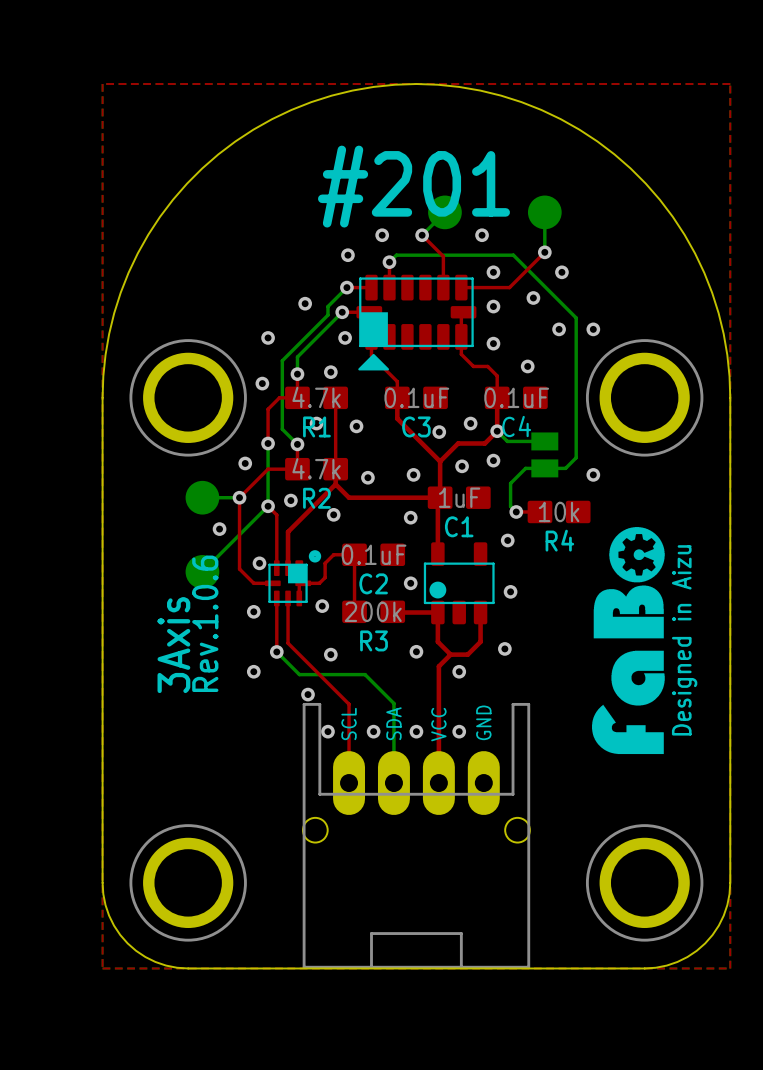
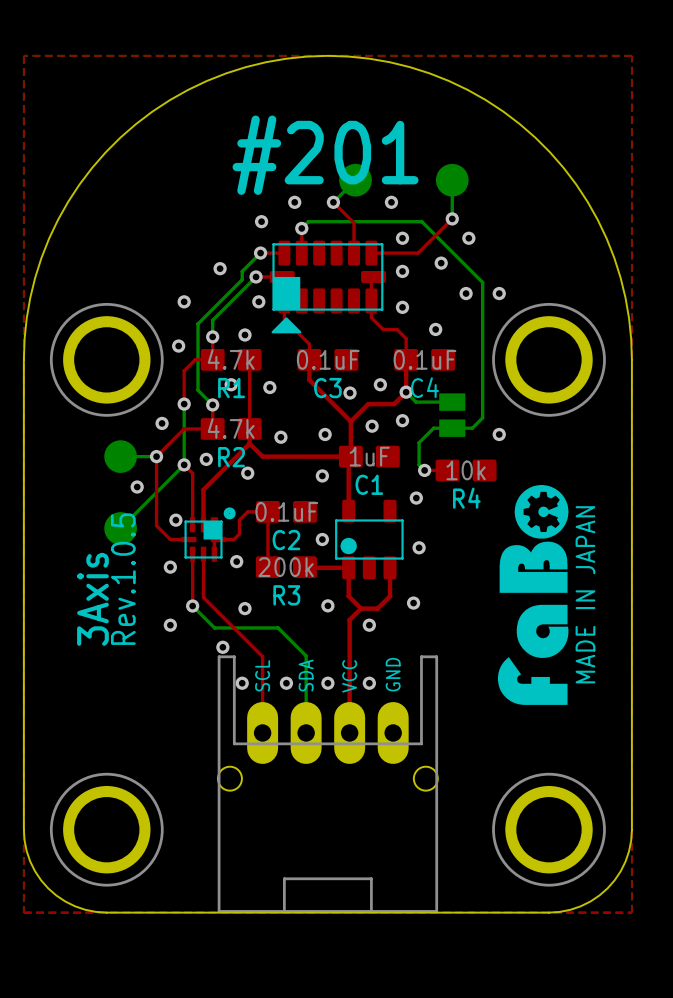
text: Rev.1.0.6 (205, 623) -> Rev.1.0.5 (123, 579)
text: Designed in Aizu (684, 640) -> MADE IN JAPAN (585, 594)

